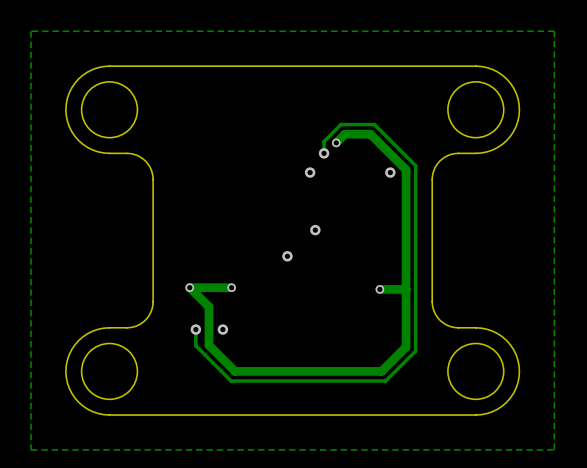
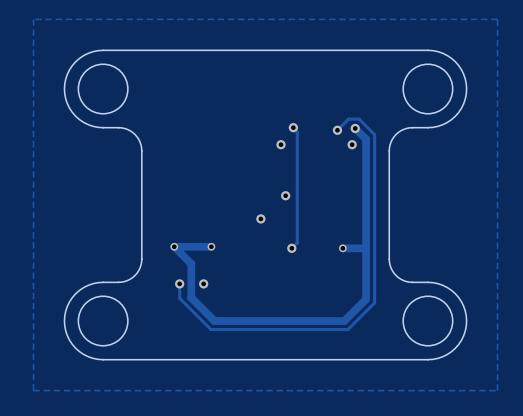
track: (336, 142) (344, 134) (370, 134) (406, 169) -> (355, 128) (366, 139) (366, 142)
via: (336, 142) -> none
track: (324, 153) (324, 141) (341, 124) (374, 124) (415, 165) -> (337, 130) (348, 119) (359, 119) (374, 134) (374, 138)
via: none -> (355, 128)
via: none -> (337, 130)
track: none -> (297, 131) (297, 242) (291, 248)
via: none -> (291, 248)

